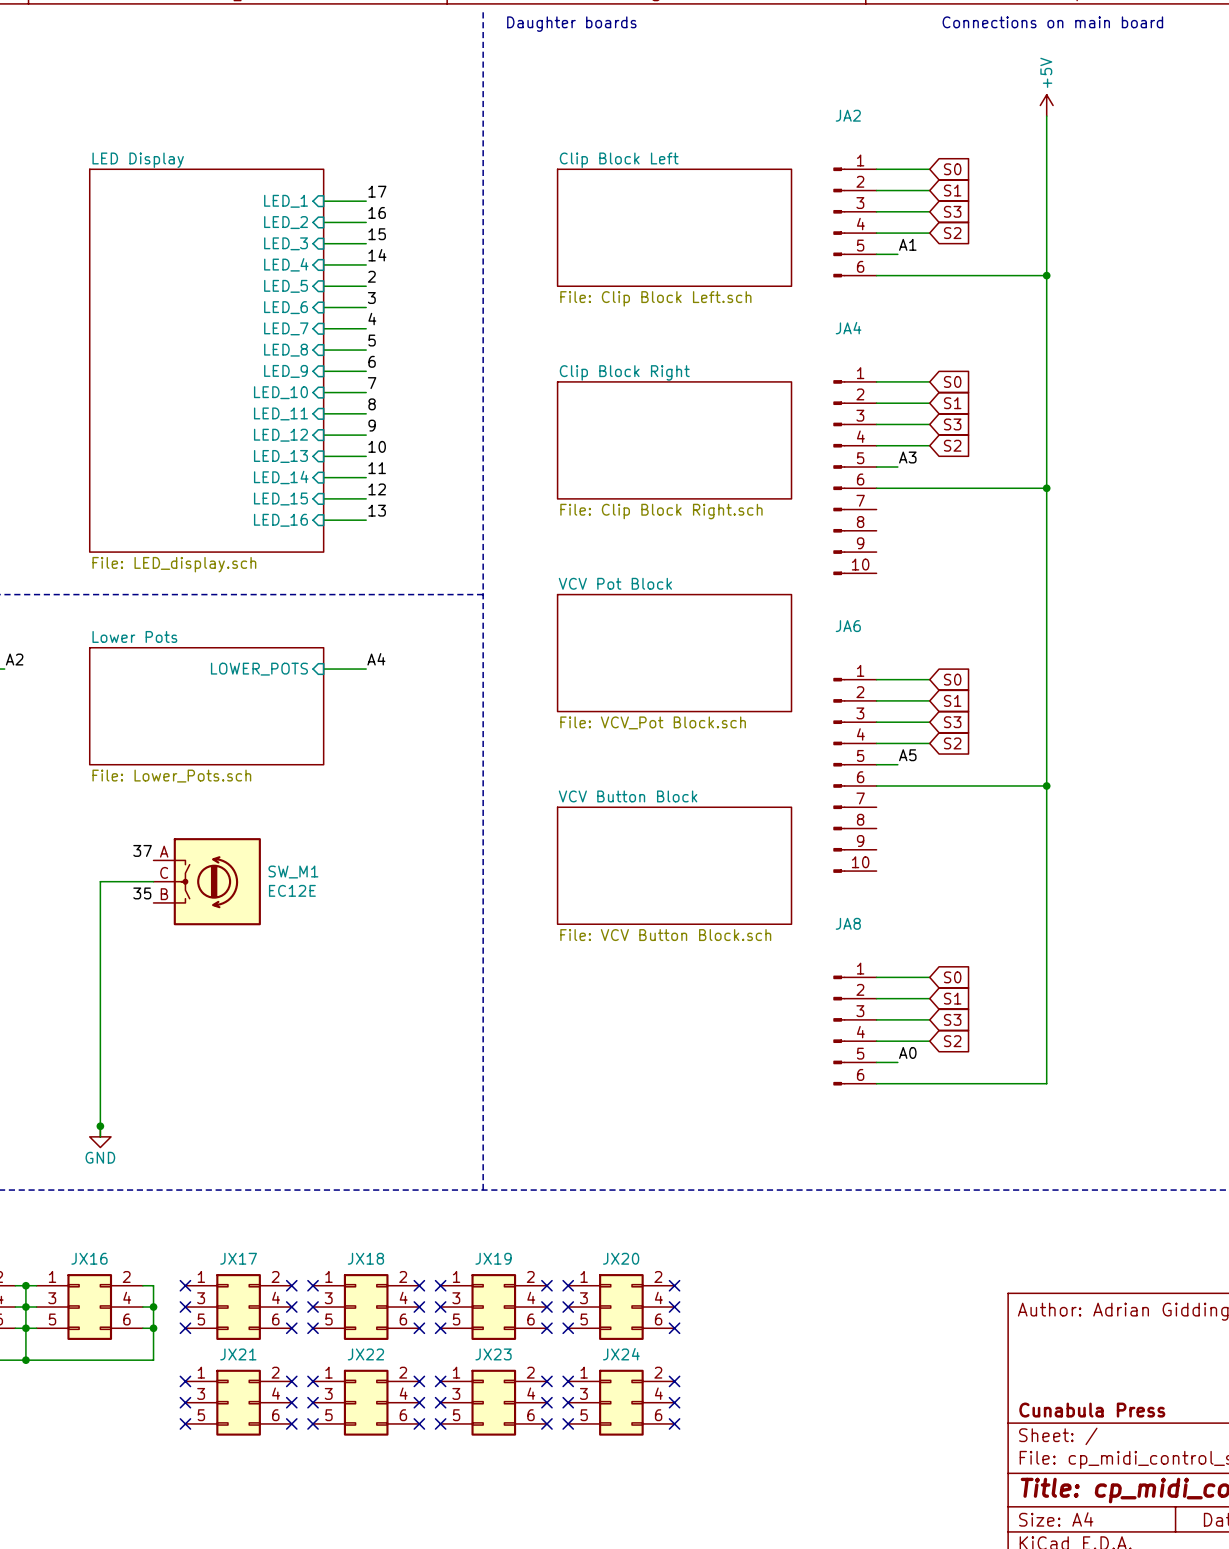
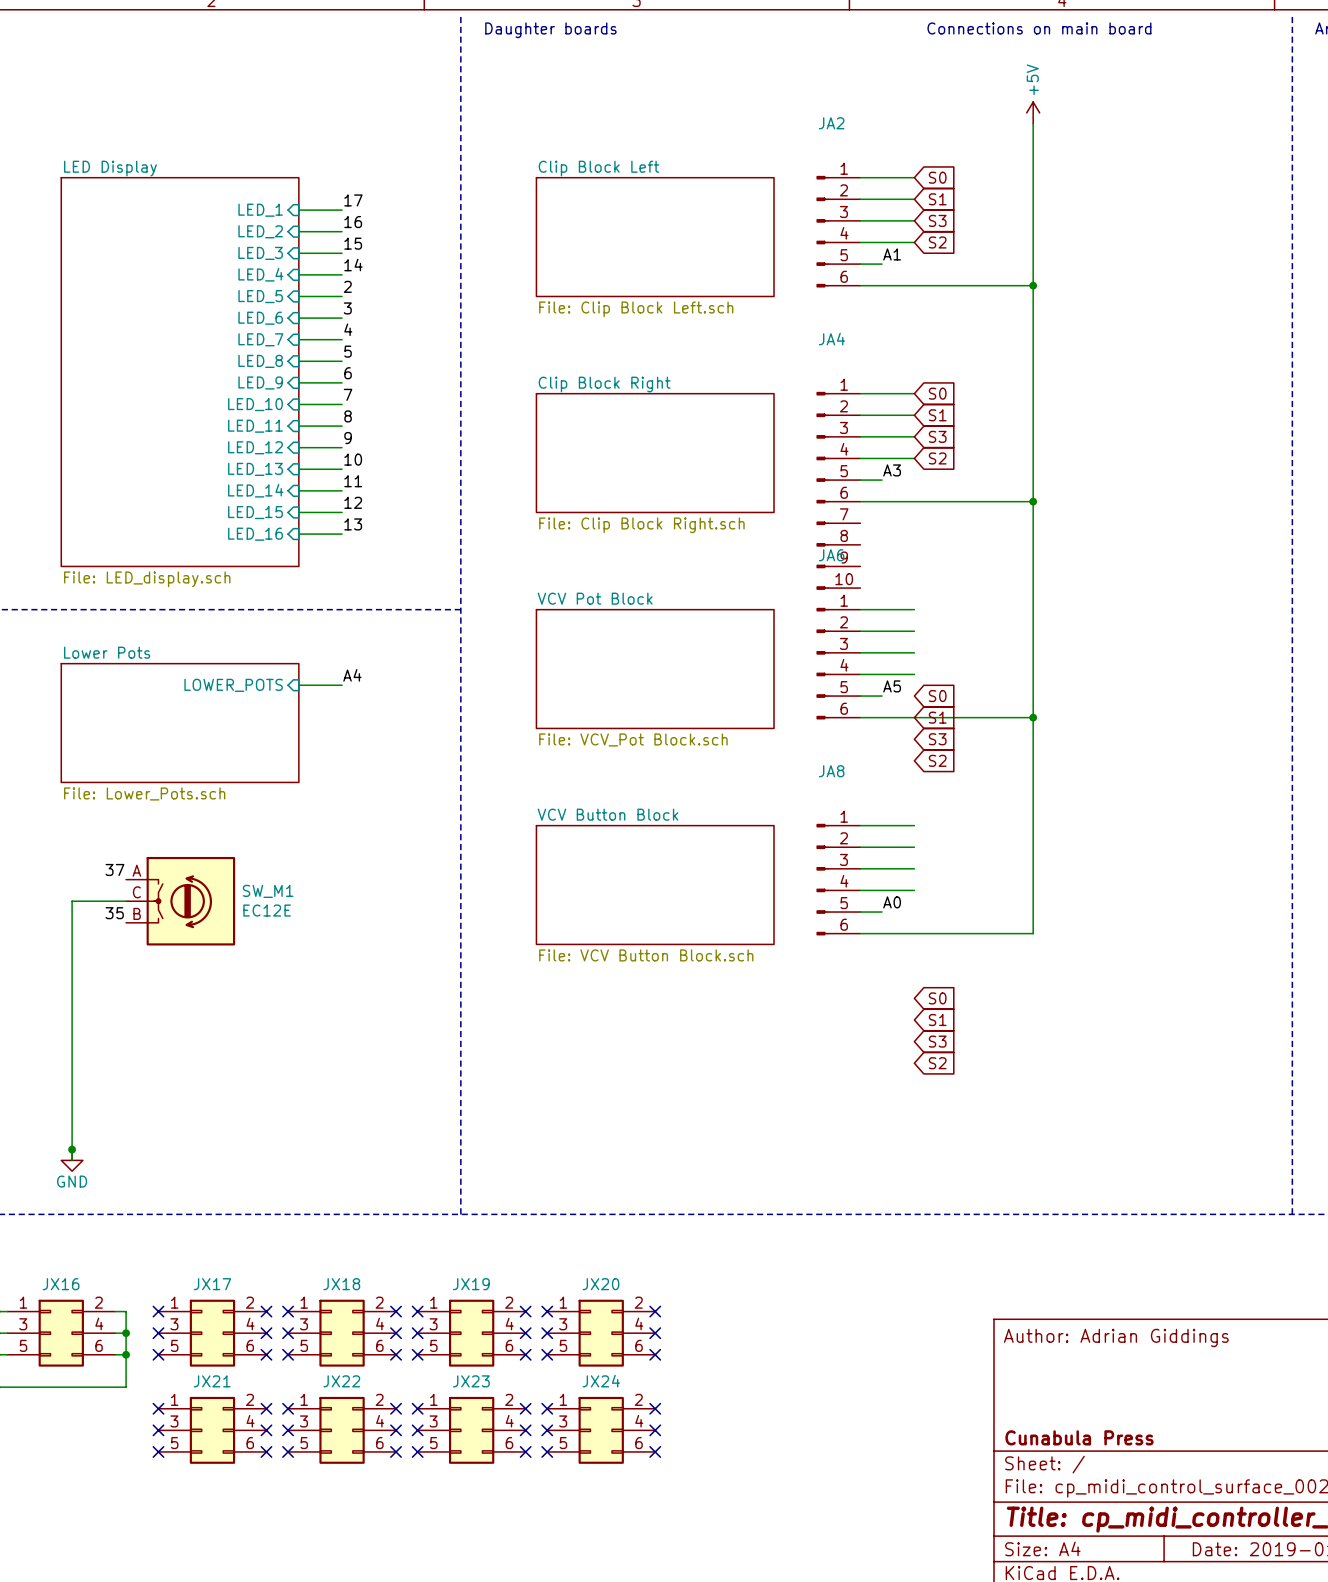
JA6 name position: JA6 (848, 626) -> JA6 (831, 555)
wire: none -> (860, 652) (914, 652)
wire: none -> (860, 674) (914, 674)
JA6 symbol: [833, 677, 877, 873] -> [816, 607, 861, 720]
wire: (897, 679) (929, 679) -> none
wire: none -> (914, 717) (1033, 717)
junction: none -> (1033, 717)
wire: (876, 722) (929, 722) -> (860, 609) (914, 609)
wire: (876, 743) (929, 743) -> (860, 631) (914, 631)
label position: A5 (907, 755) -> A5 (892, 686)
wire: (876, 764) (897, 764) -> none
wire: (876, 785) (1046, 785) -> none
junction: (1046, 785) -> none
wire: (1046, 913) (1046, 1083) (876, 1083) -> (1033, 933) (860, 933)
wire: (876, 977) (929, 977) -> (860, 825) (914, 825)
wire: (876, 998) (929, 998) -> (860, 847) (914, 847)
wire: (876, 1019) (929, 1019) -> (860, 868) (914, 868)
JA8 position: (854, 1030) -> (838, 879)
wire: (876, 1041) (929, 1041) -> (860, 890) (914, 890)
label position: A0 (907, 1052) -> A0 (892, 902)
wire: (876, 1062) (897, 1062) -> (860, 912) (882, 912)

